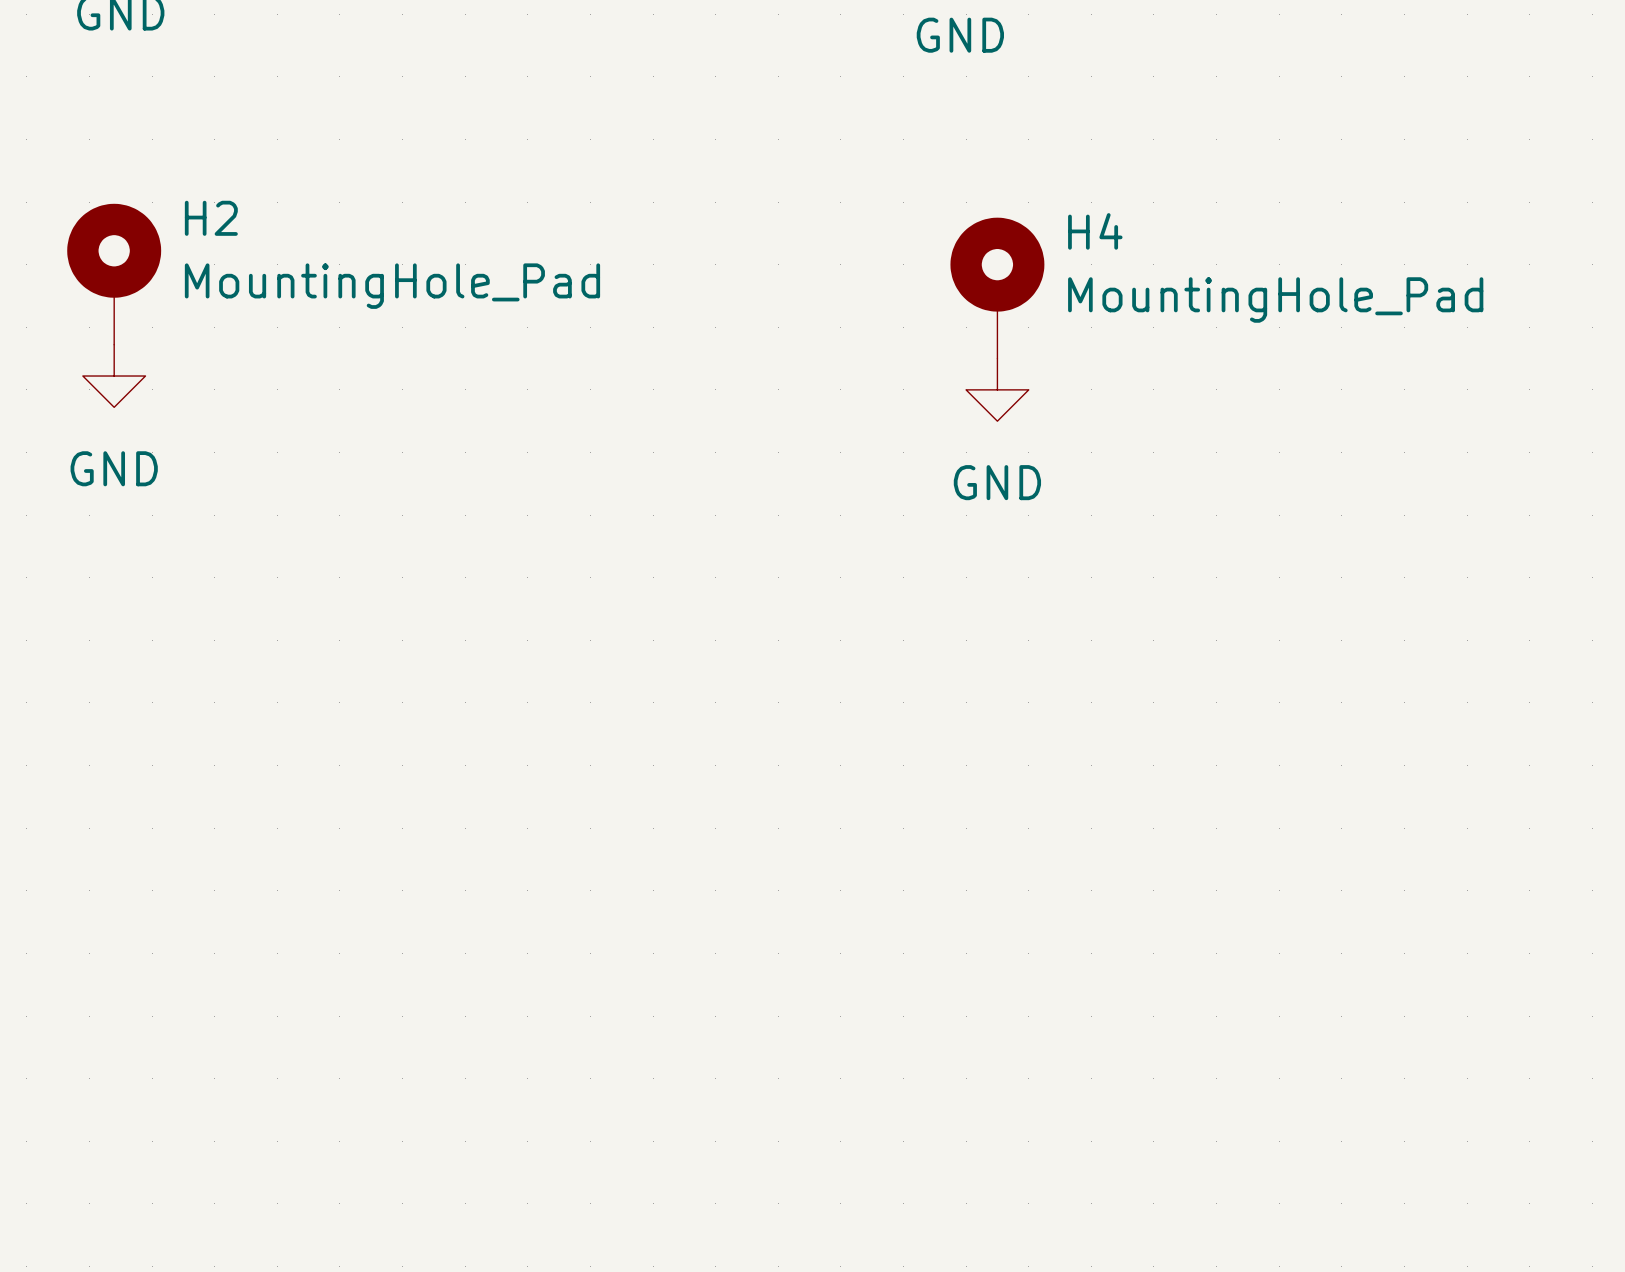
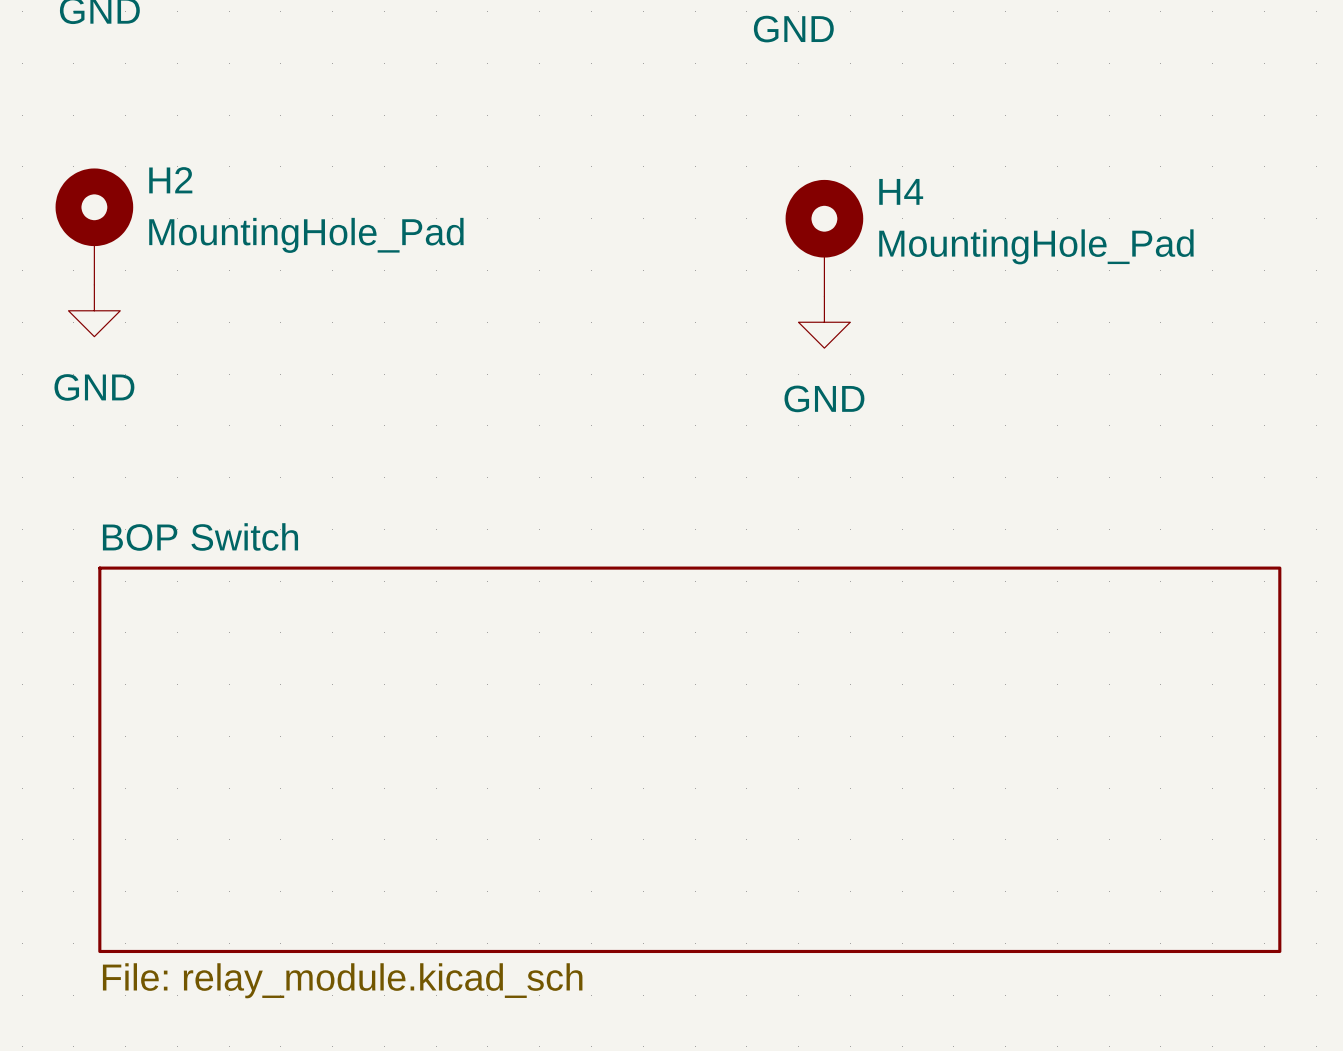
sheet BOP Switch: none -> File: relay_module.kicad_sch (689, 759)

